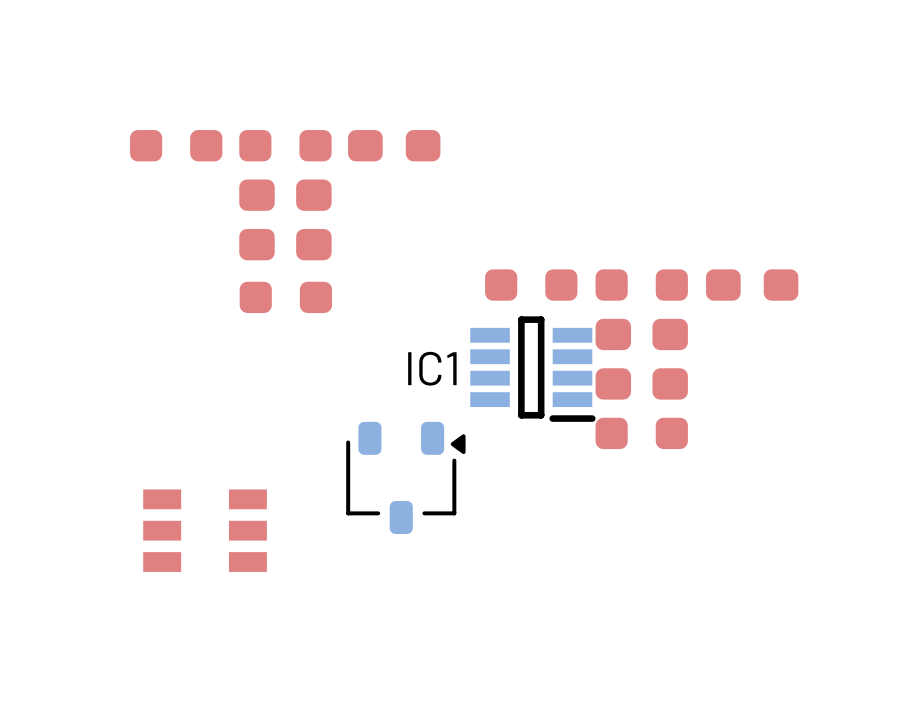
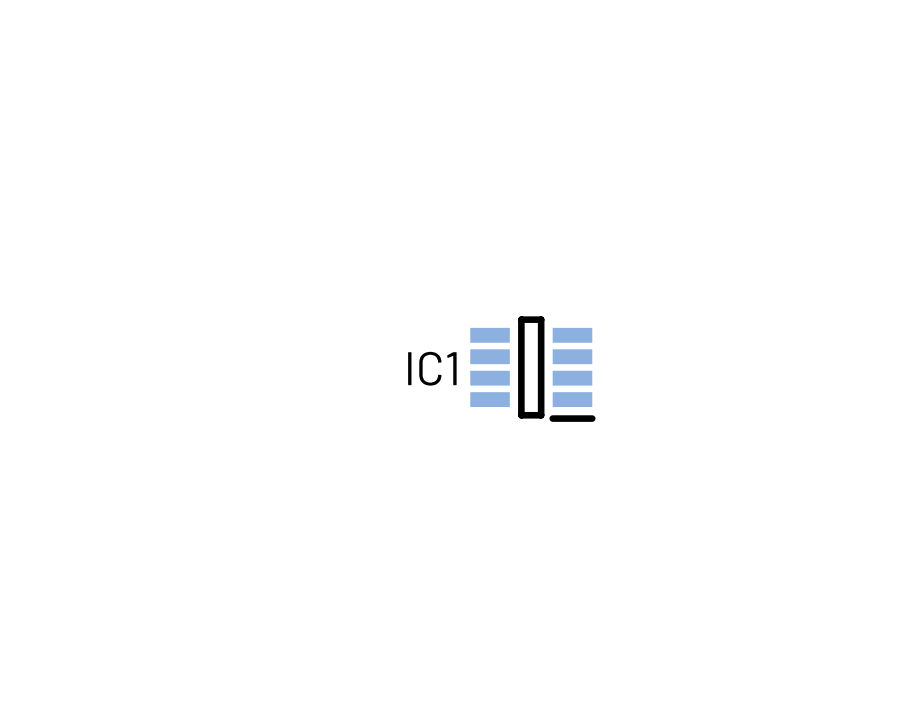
part: (176, 145) -> none
part: (285, 145) -> none
part: (394, 145) -> none
part: (285, 195) -> none
part: (285, 244) -> none
part: (531, 285) -> none
part: (641, 285) -> none
part: (752, 285) -> none
part: (285, 297) -> none
part: (641, 334) -> none
part: (641, 383) -> none
part: (641, 433) -> none
part: (405, 477) -> none
part: (205, 530) -> none

